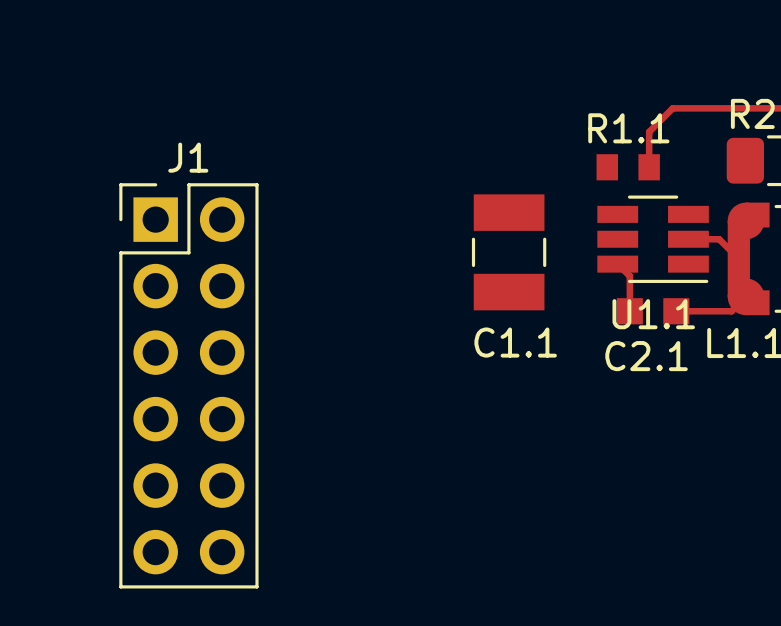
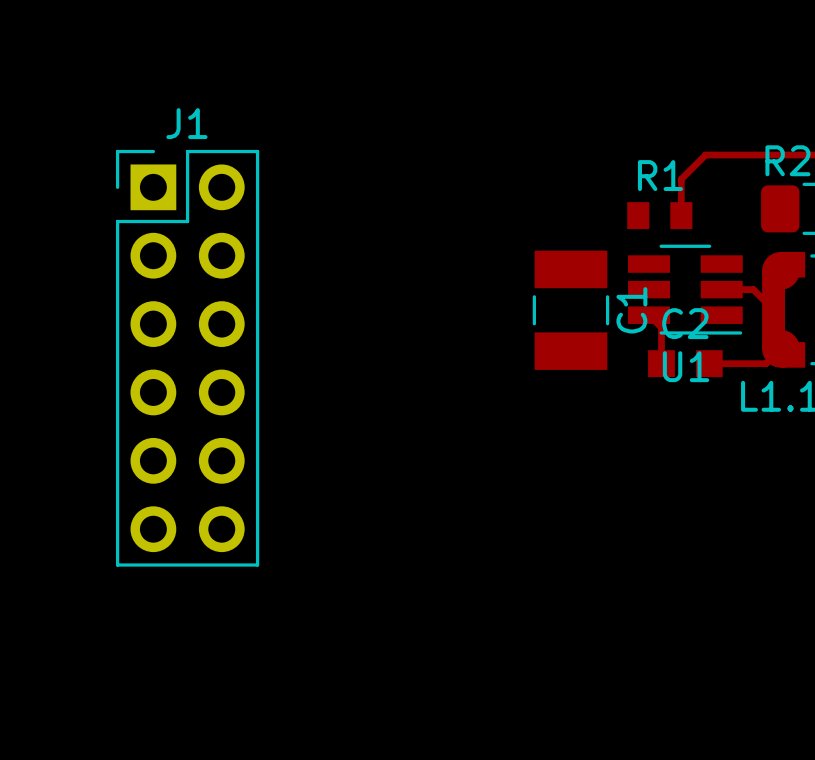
R1.1 name: R1.1 (628, 128) -> R1 (660, 175)
C1.1: (509, 252) -> none
C1: none -> (570, 310)
U1.1 name: U1.1 (653, 314) -> U1 (686, 366)
C2.1 name: C2.1 (646, 356) -> C2 (685, 323)
J1 position: (188, 385) -> (187, 358)

